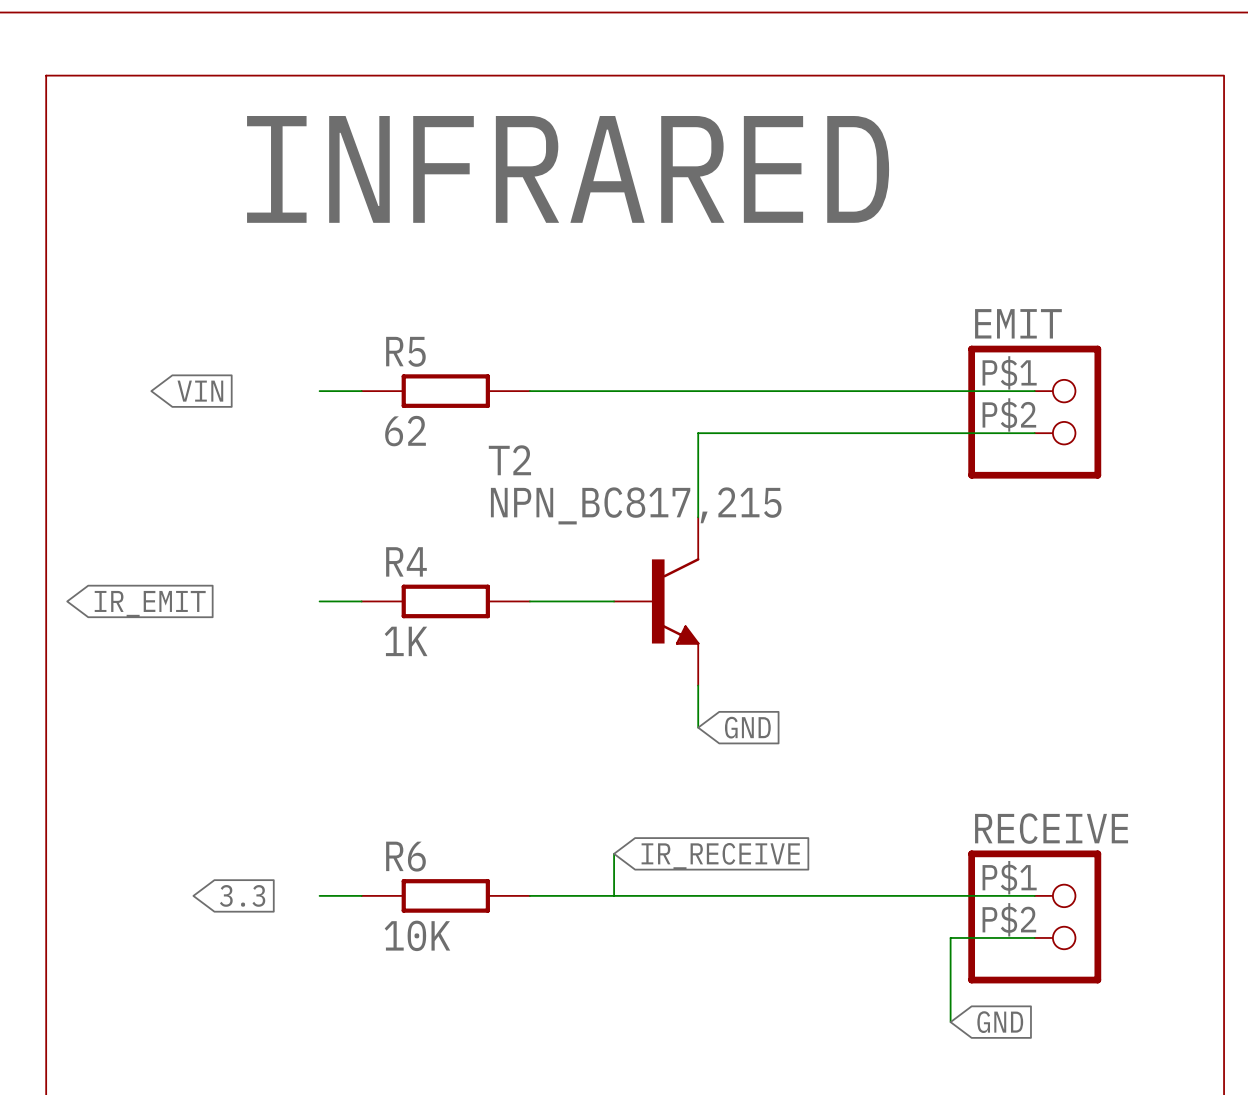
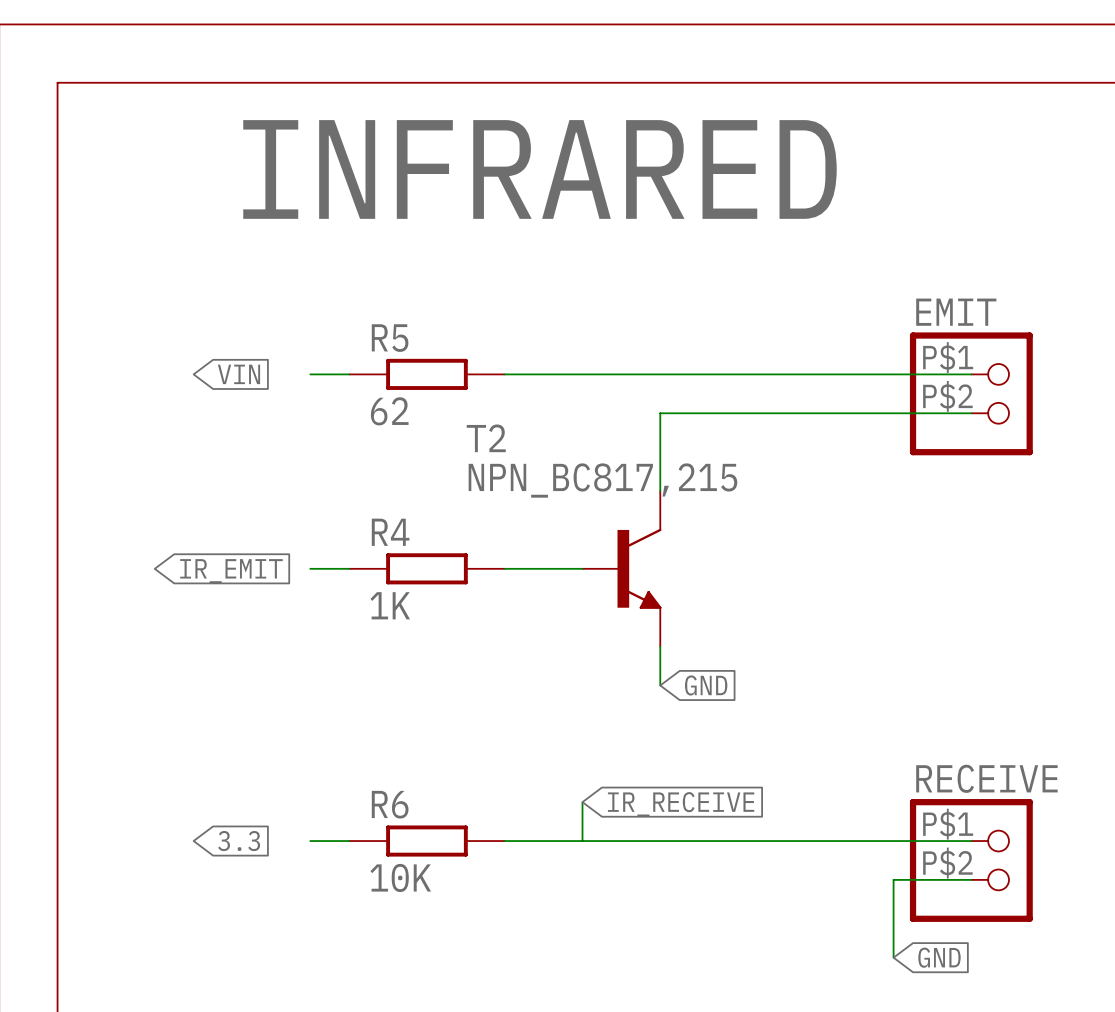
global label position: VIN (200, 391) -> VIN (238, 374)
global label position: IR_EMIT (150, 603) -> IR_EMIT (231, 571)

